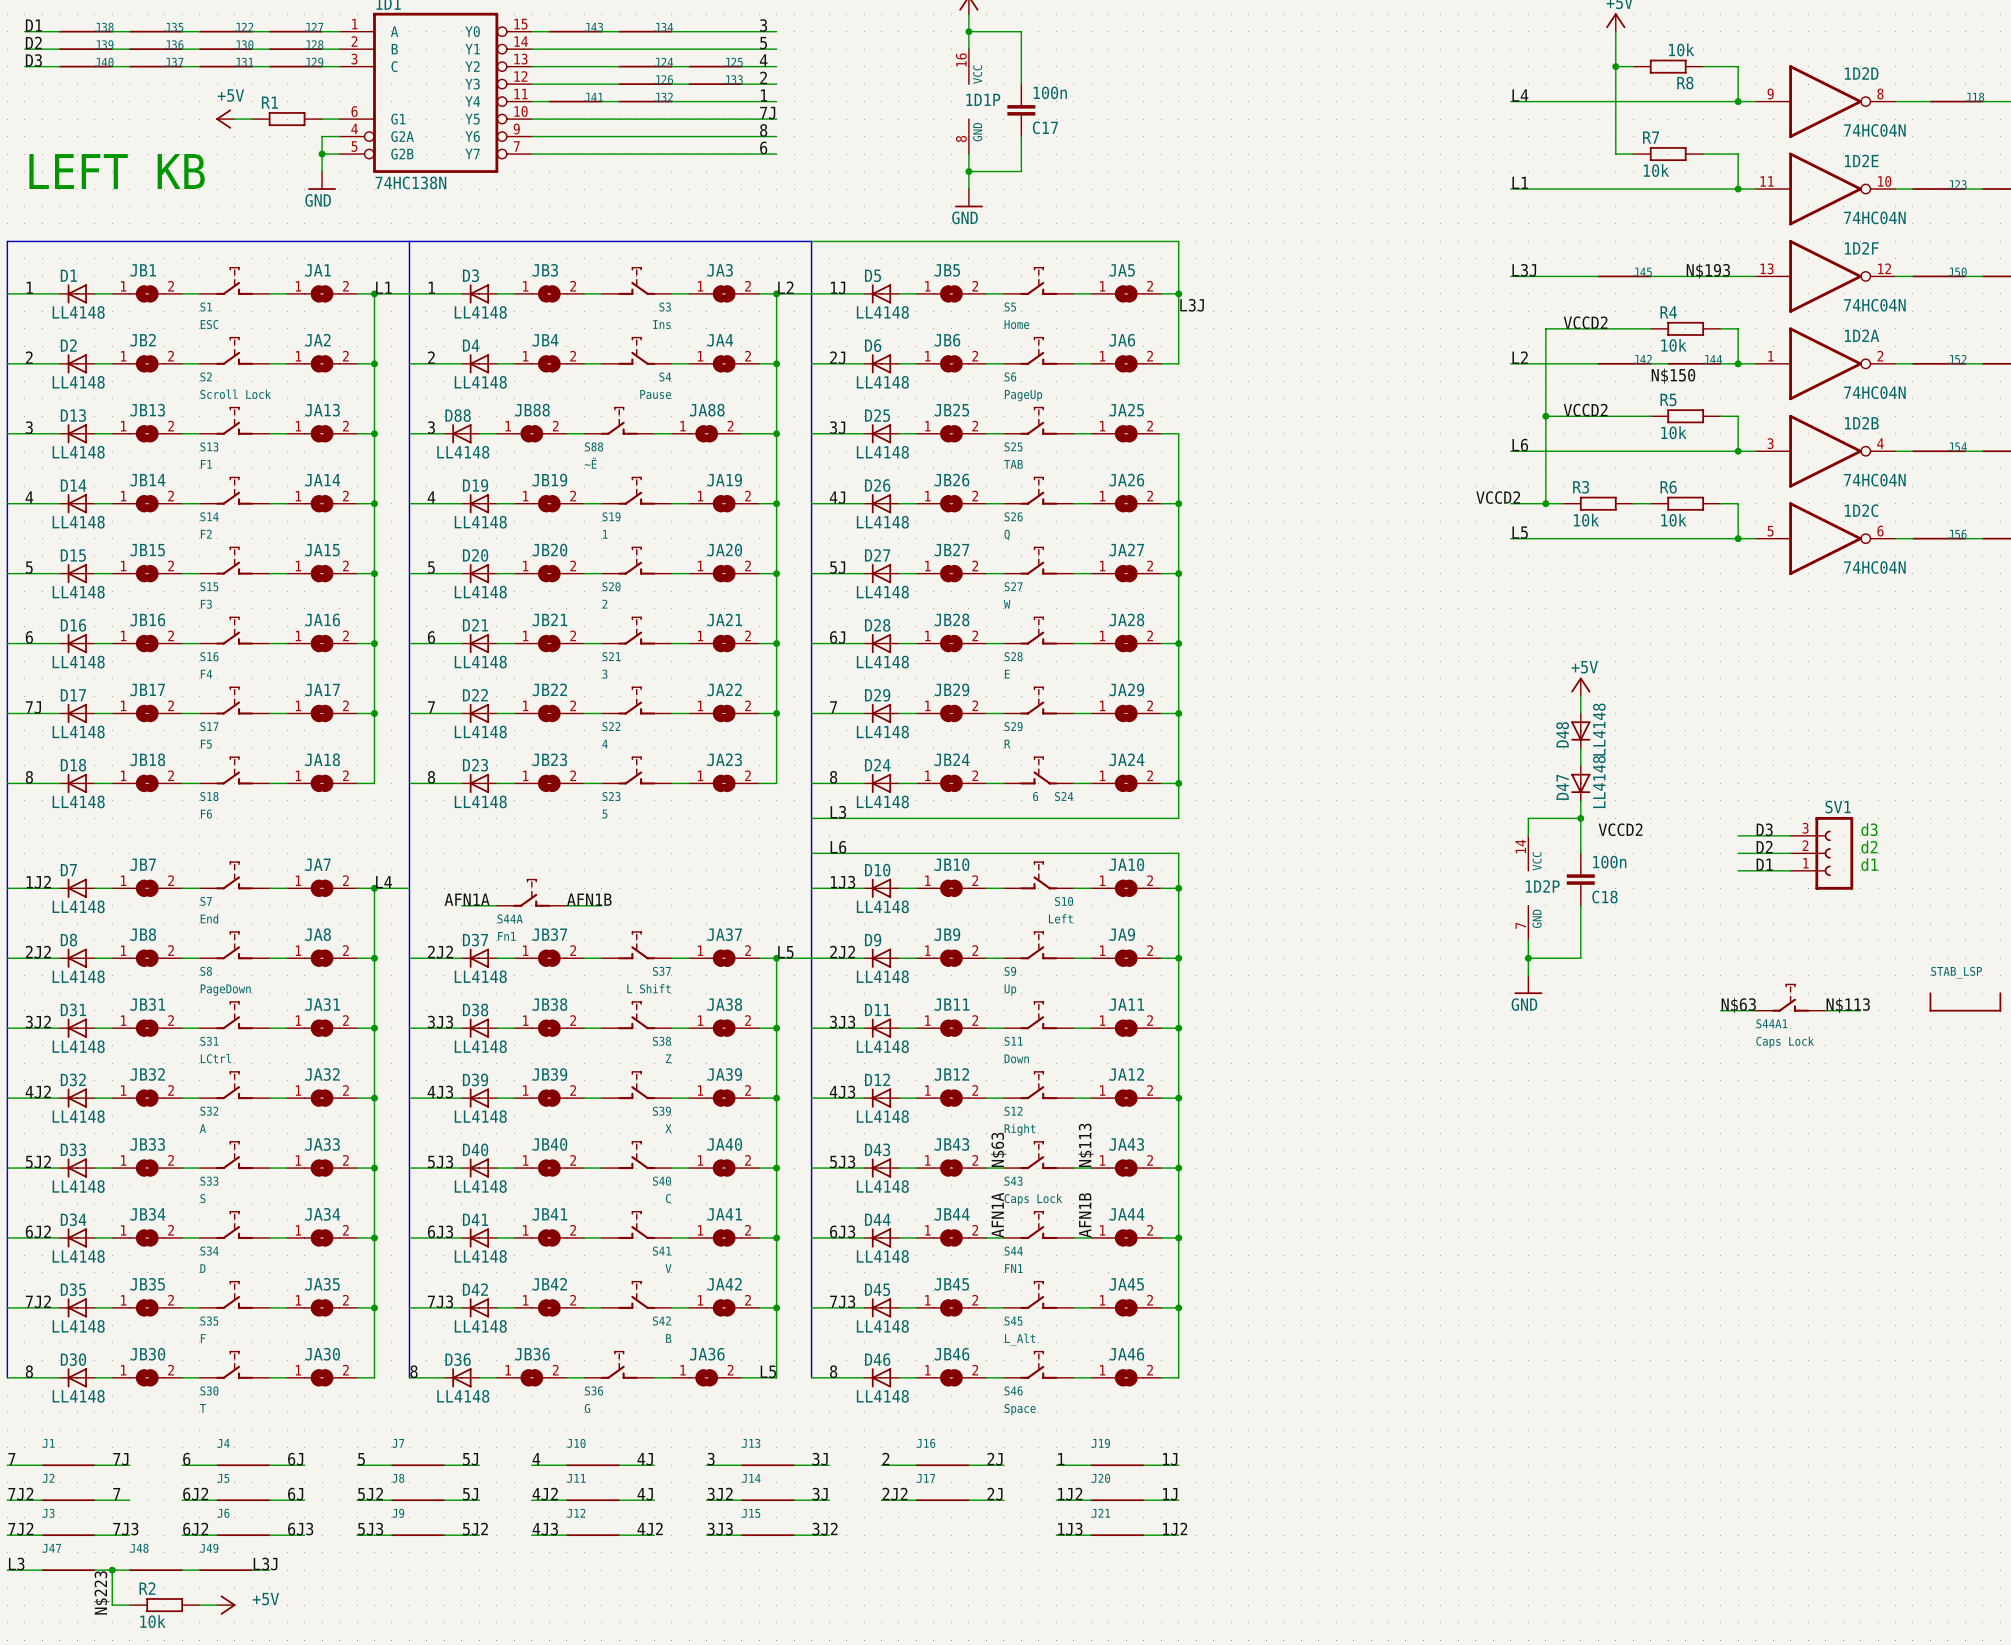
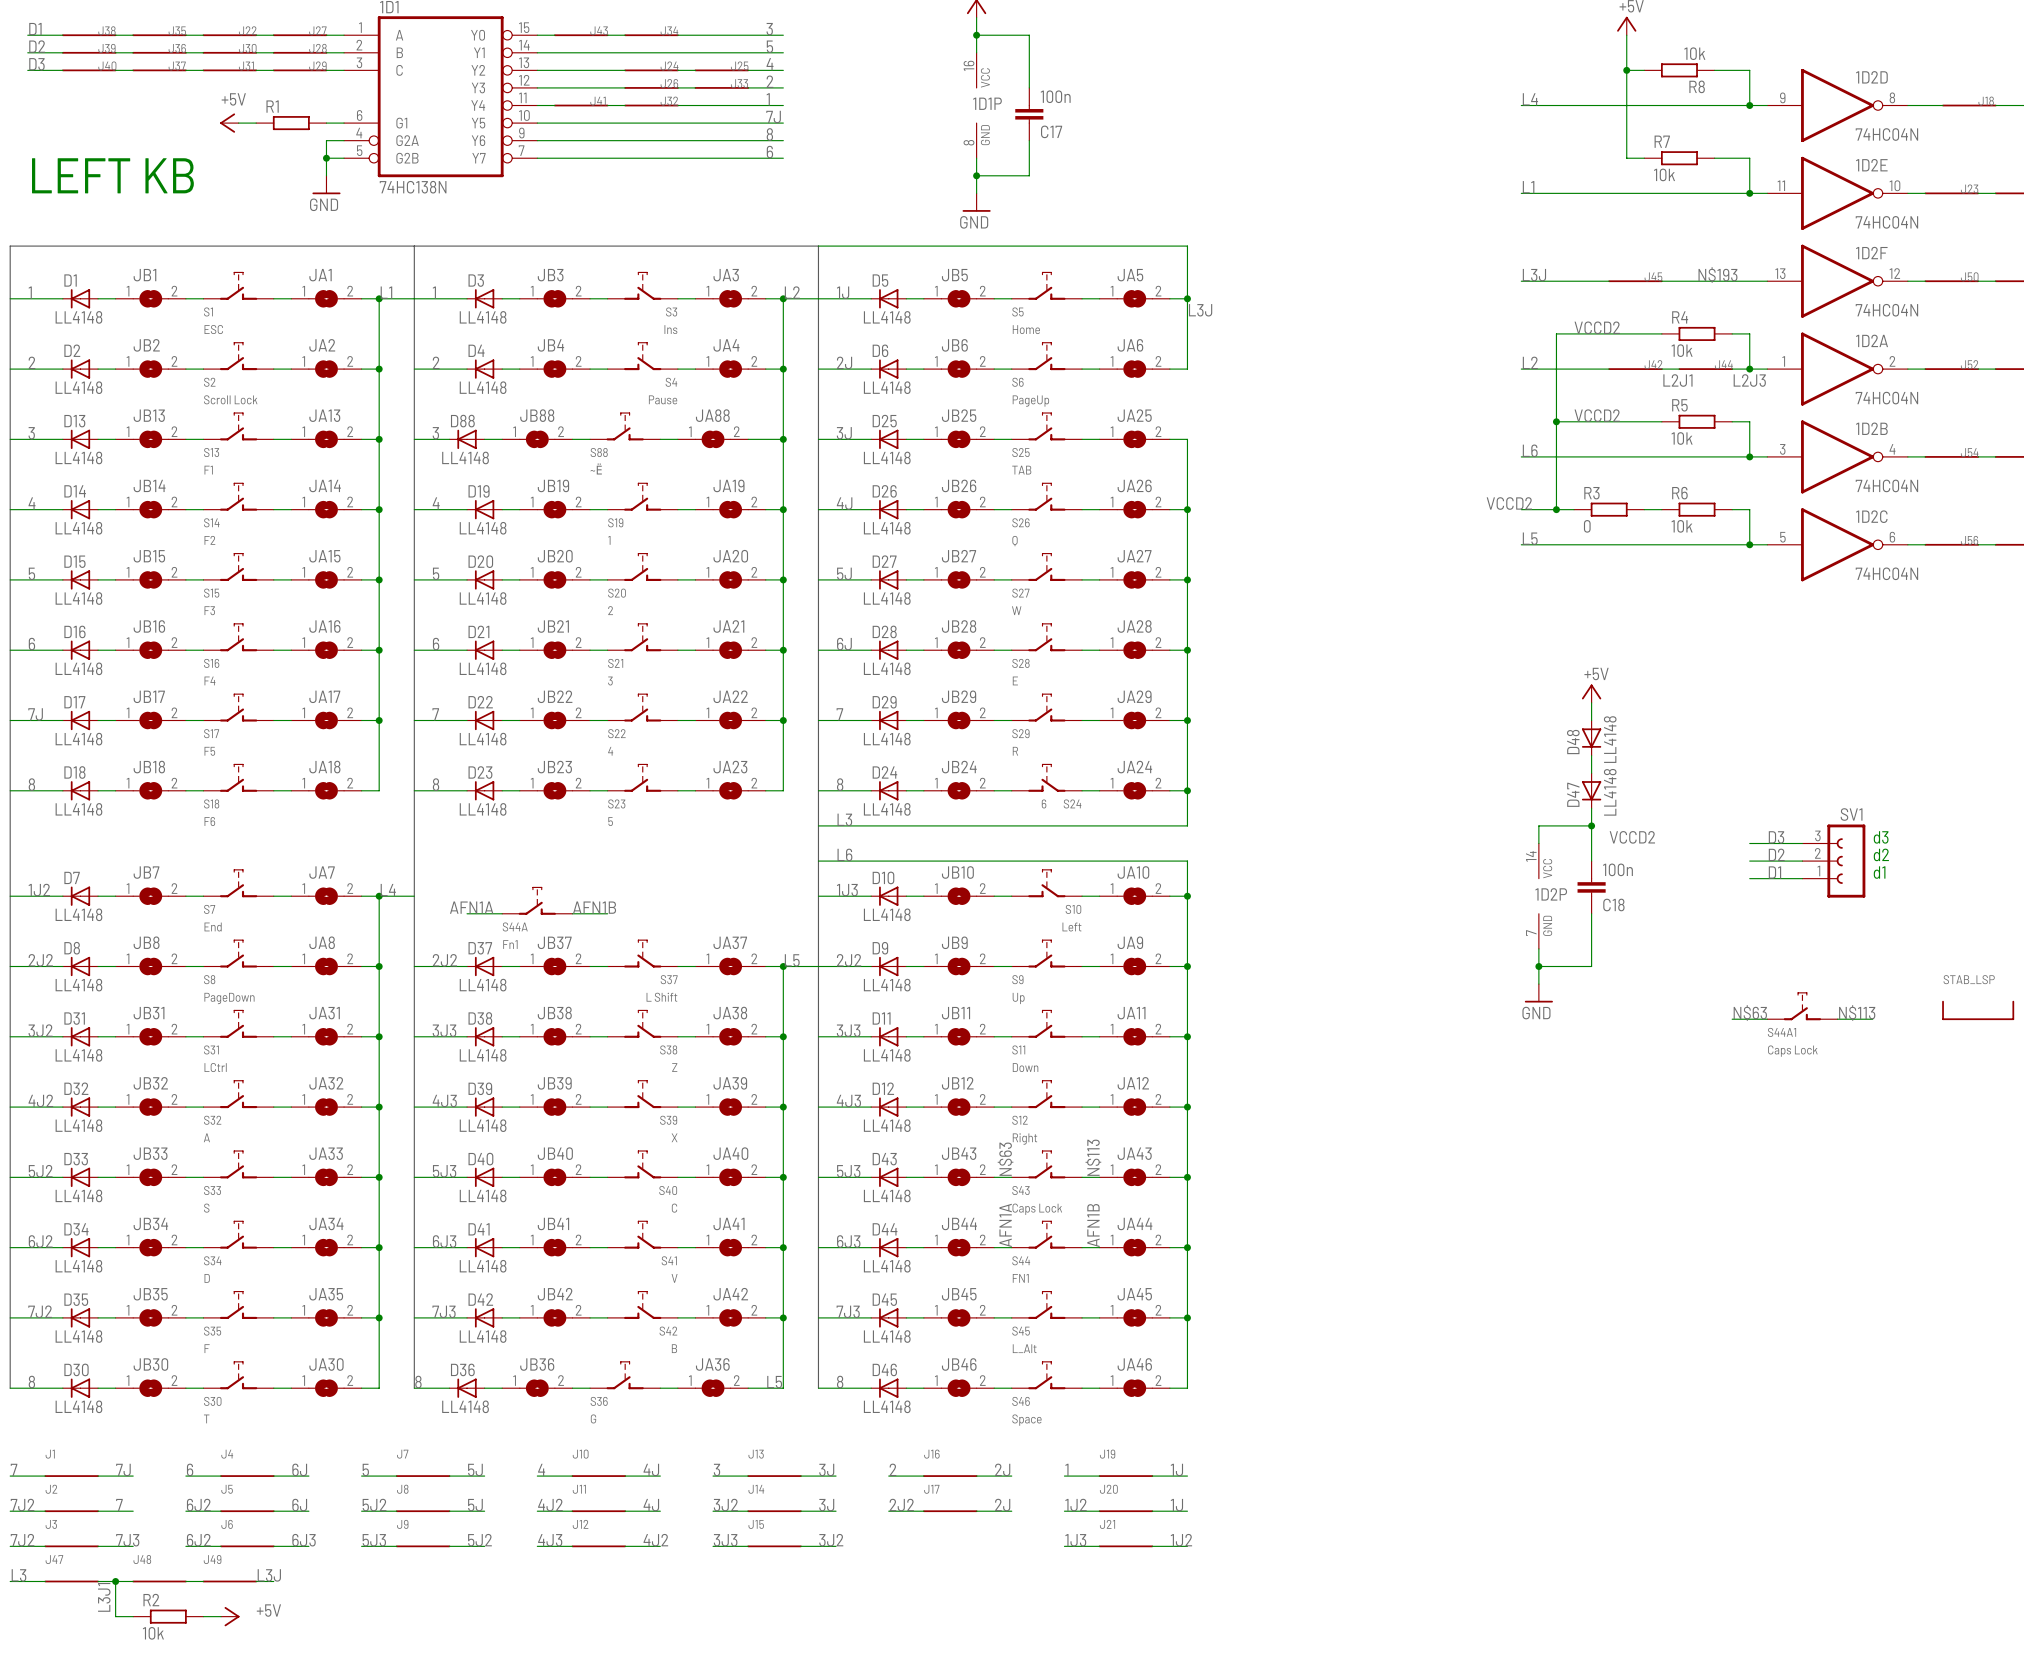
label: none -> L2J3 (1749, 380)
label: N$150 (1673, 376) -> L2J1 (1677, 380)
R3 value: 10k (1586, 520) -> 0 (1587, 526)
label: N$223 (101, 1592) -> L3J1 (104, 1597)

